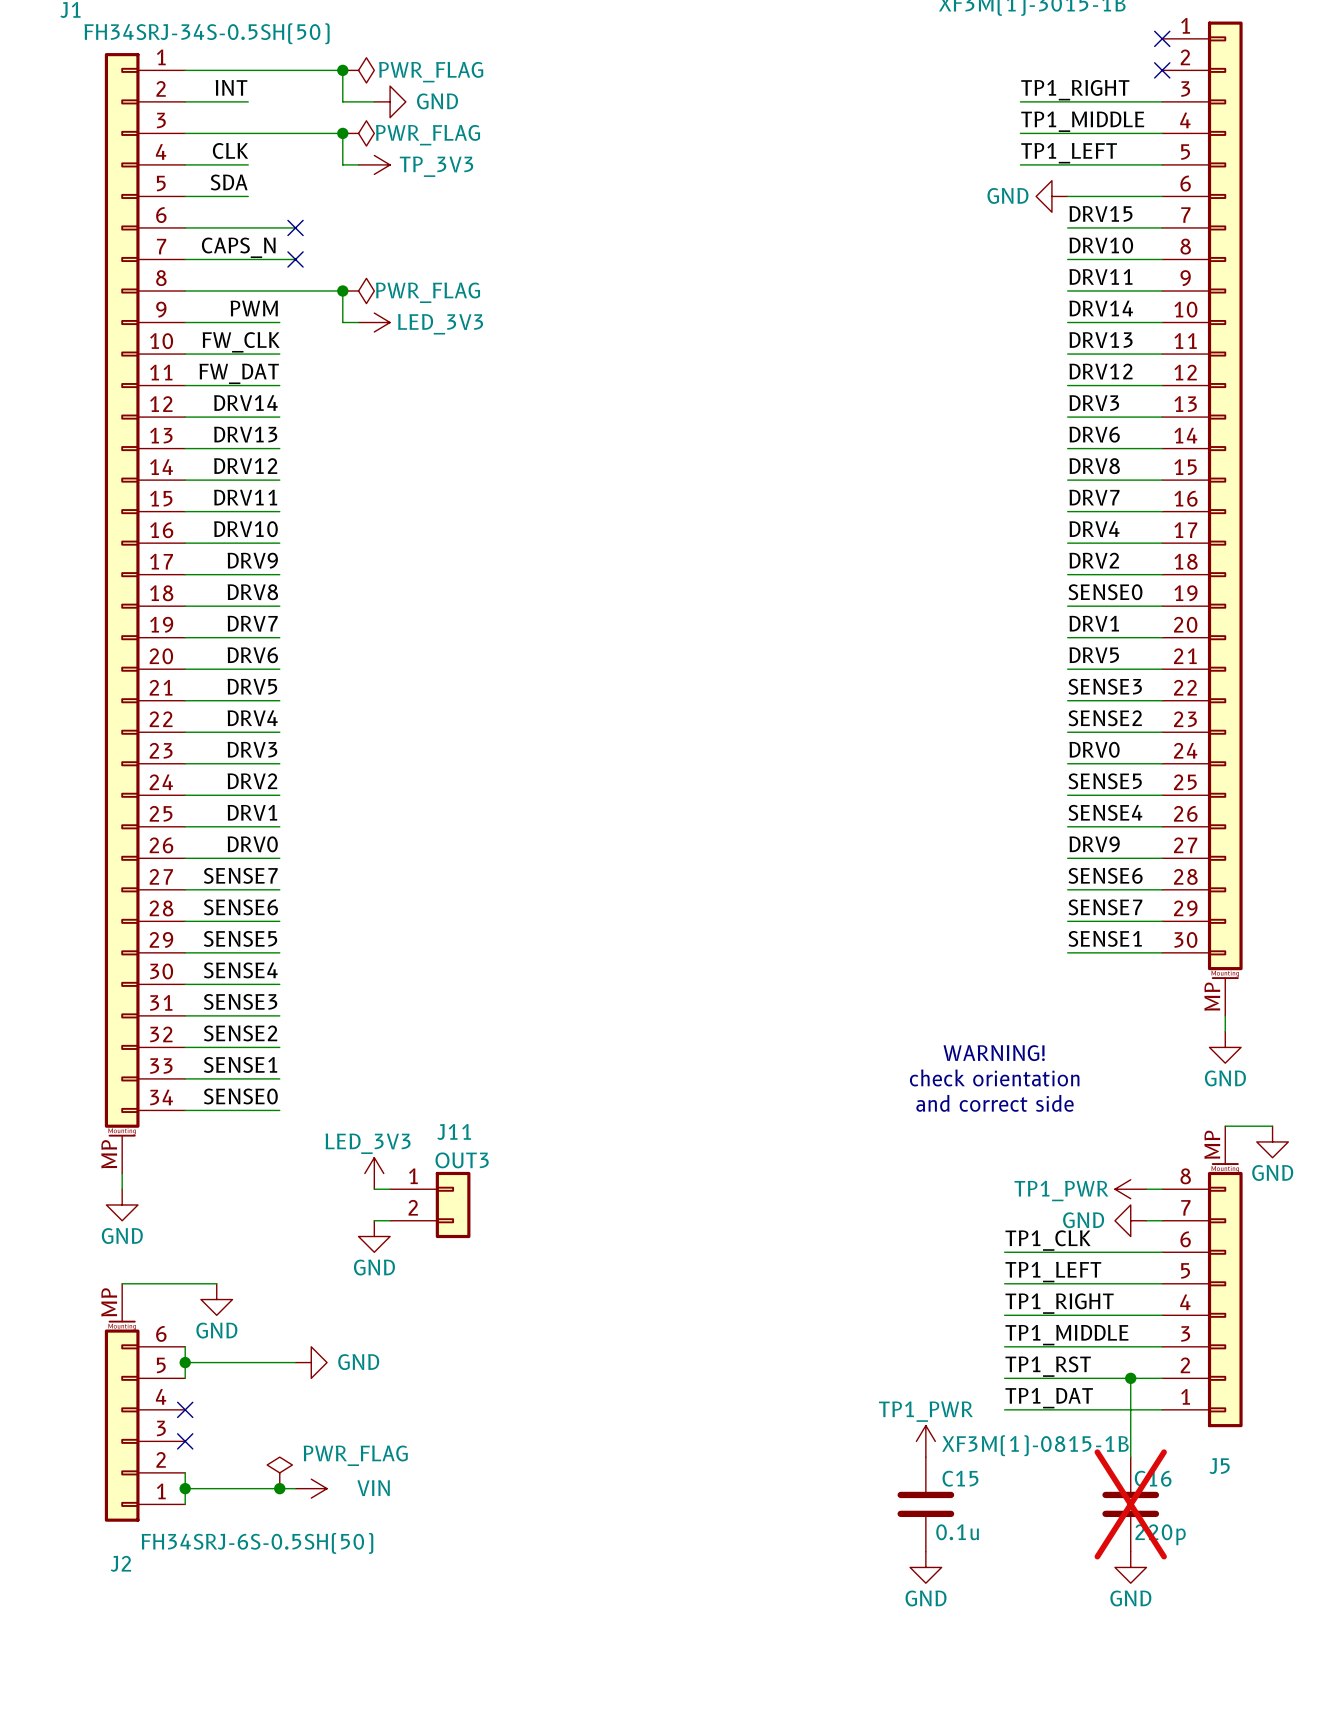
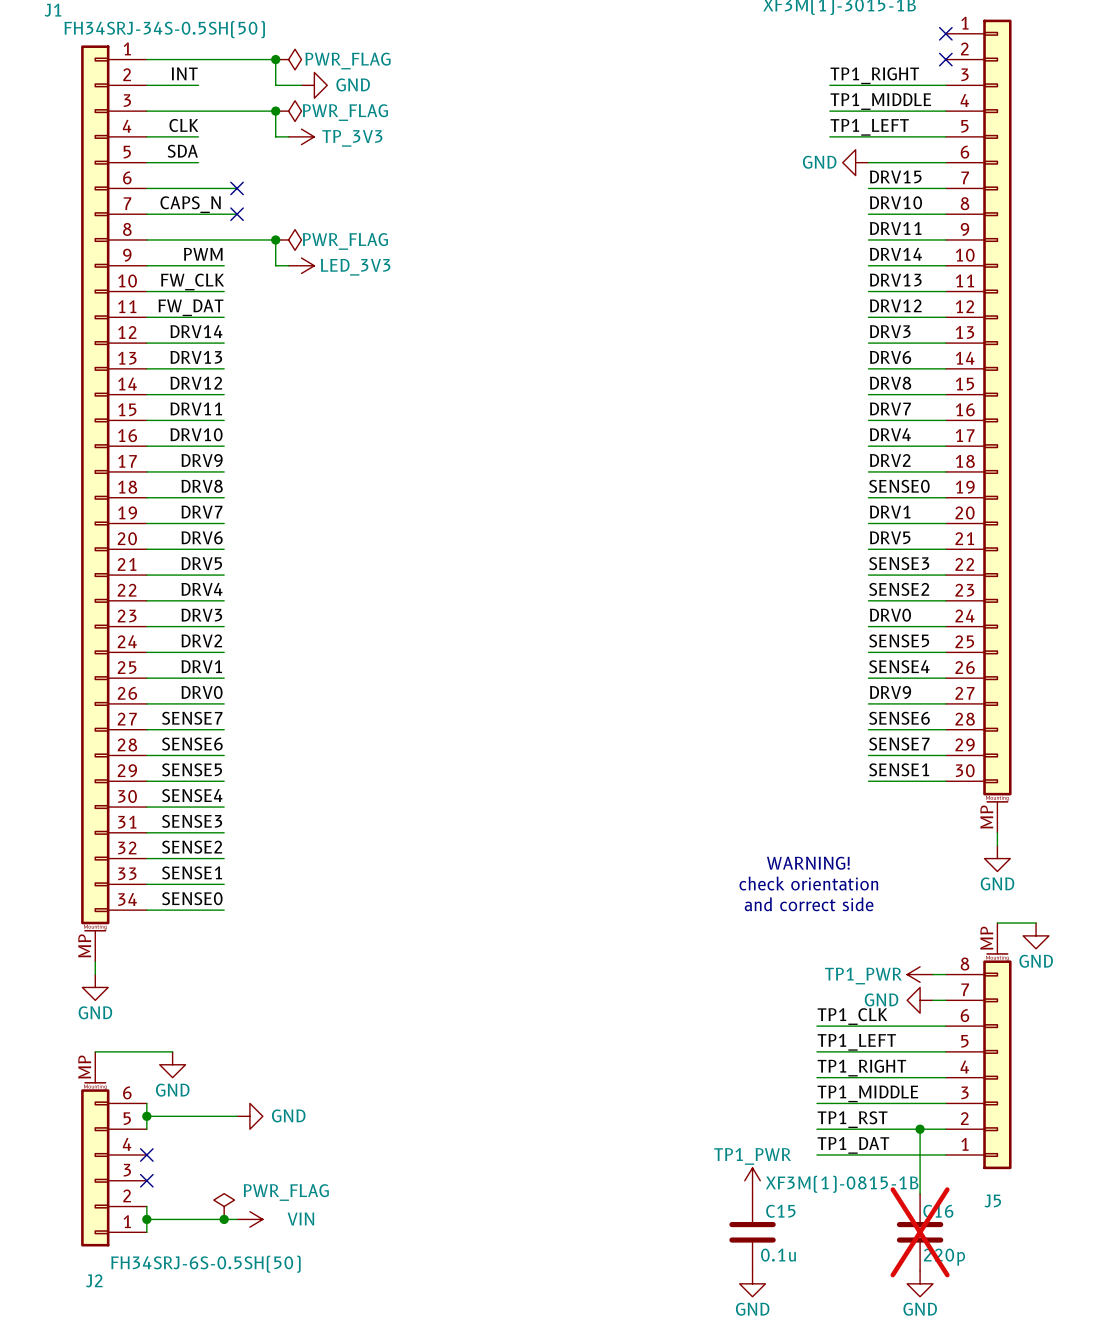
power symbol: LED_3V3 (374, 1173) -> none
wire: (374, 1189) (390, 1189) -> none
J11: OUT3 (430, 1204) -> none
wire: (374, 1220) (390, 1220) -> none
power symbol: GND (374, 1236) -> none

